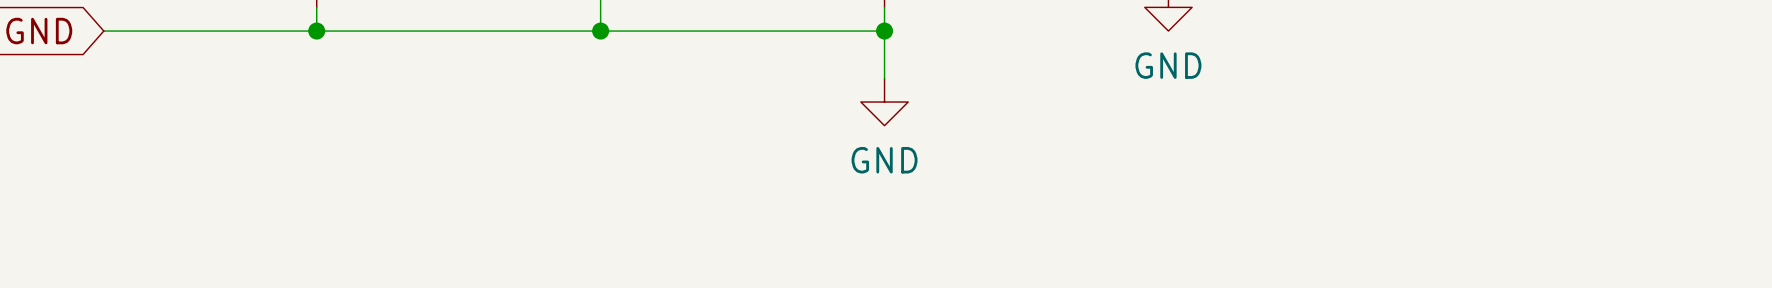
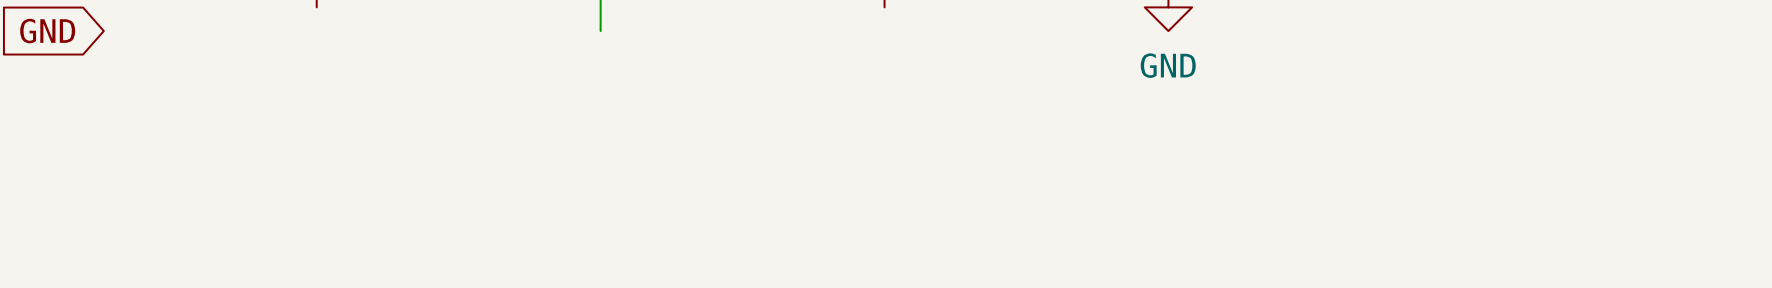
wire: (316, 7) (316, 31) -> none
wire: (884, 7) (884, 78) -> none
wire: (103, 31) (884, 31) -> none
junction: (316, 31) -> none
junction: (600, 31) -> none
junction: (884, 31) -> none
power symbol: GND (884, 102) -> none

